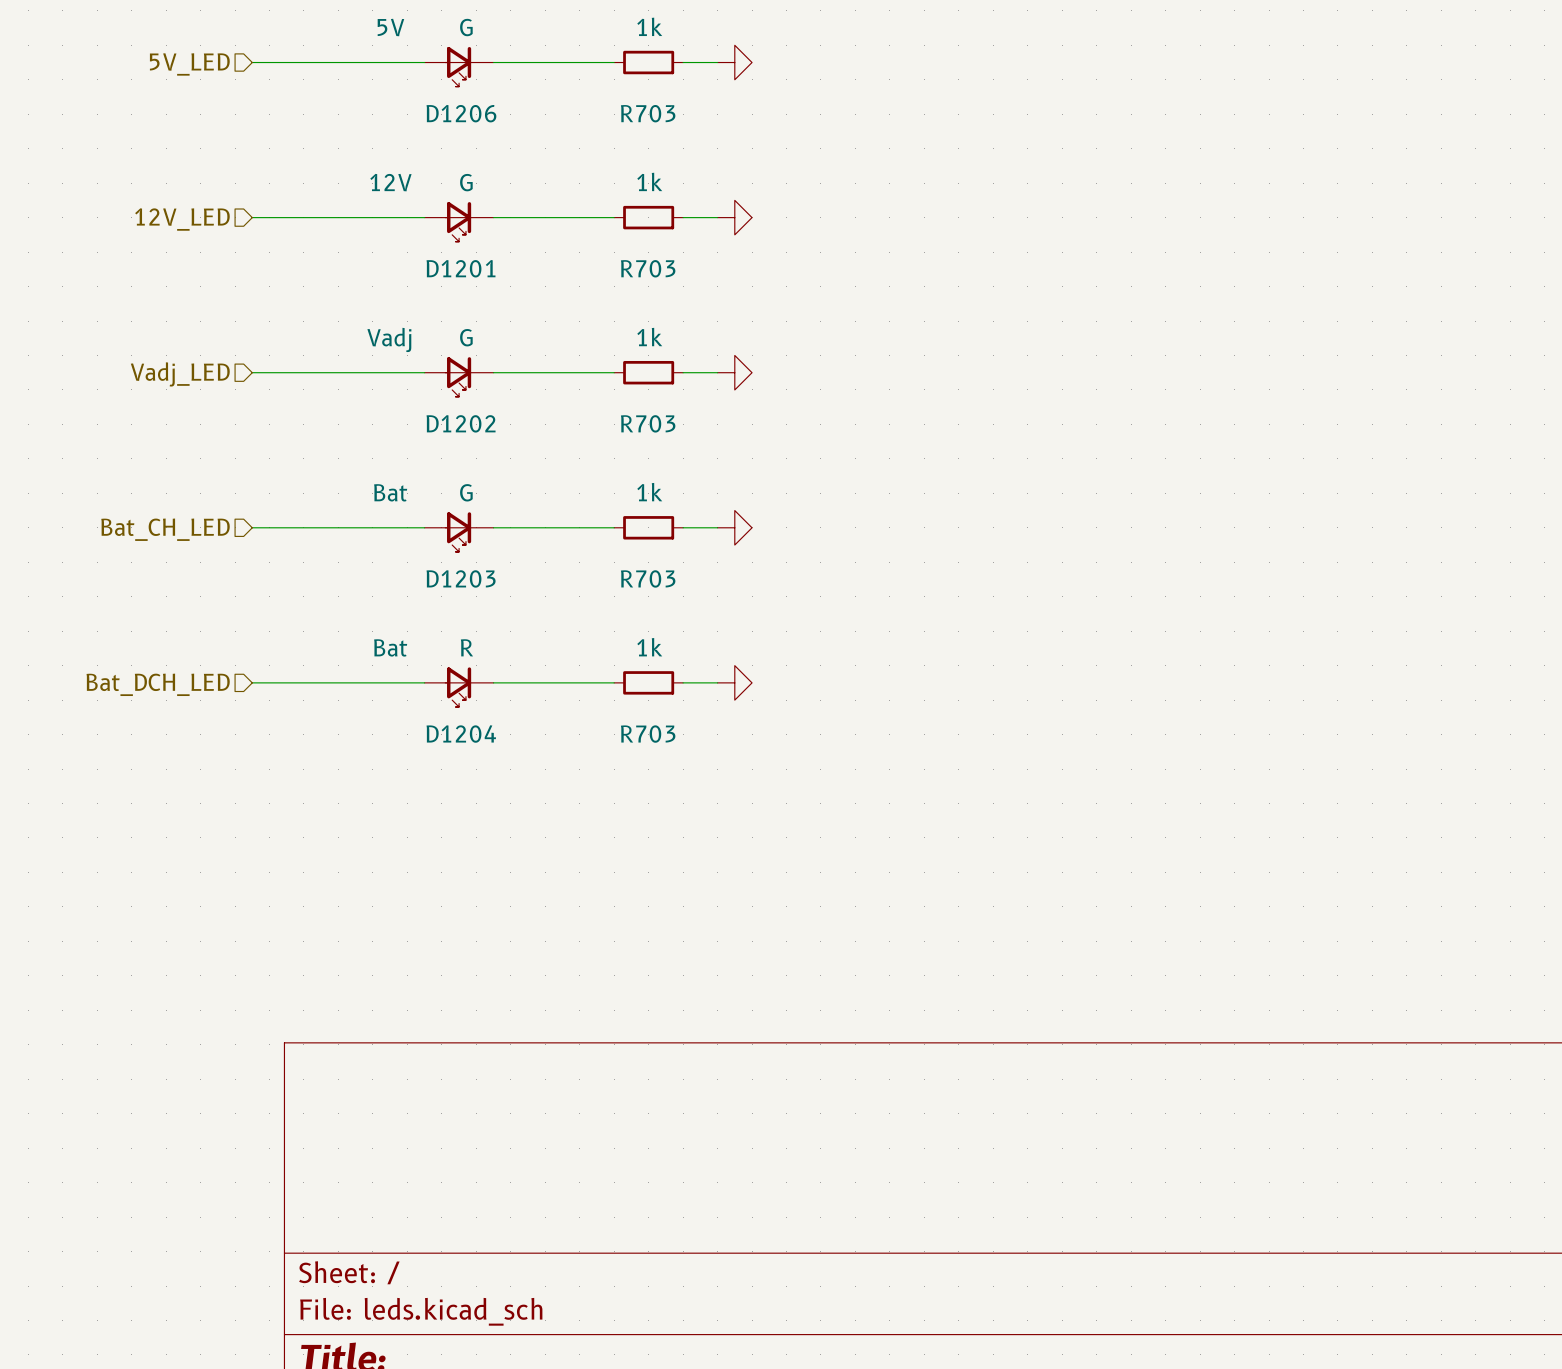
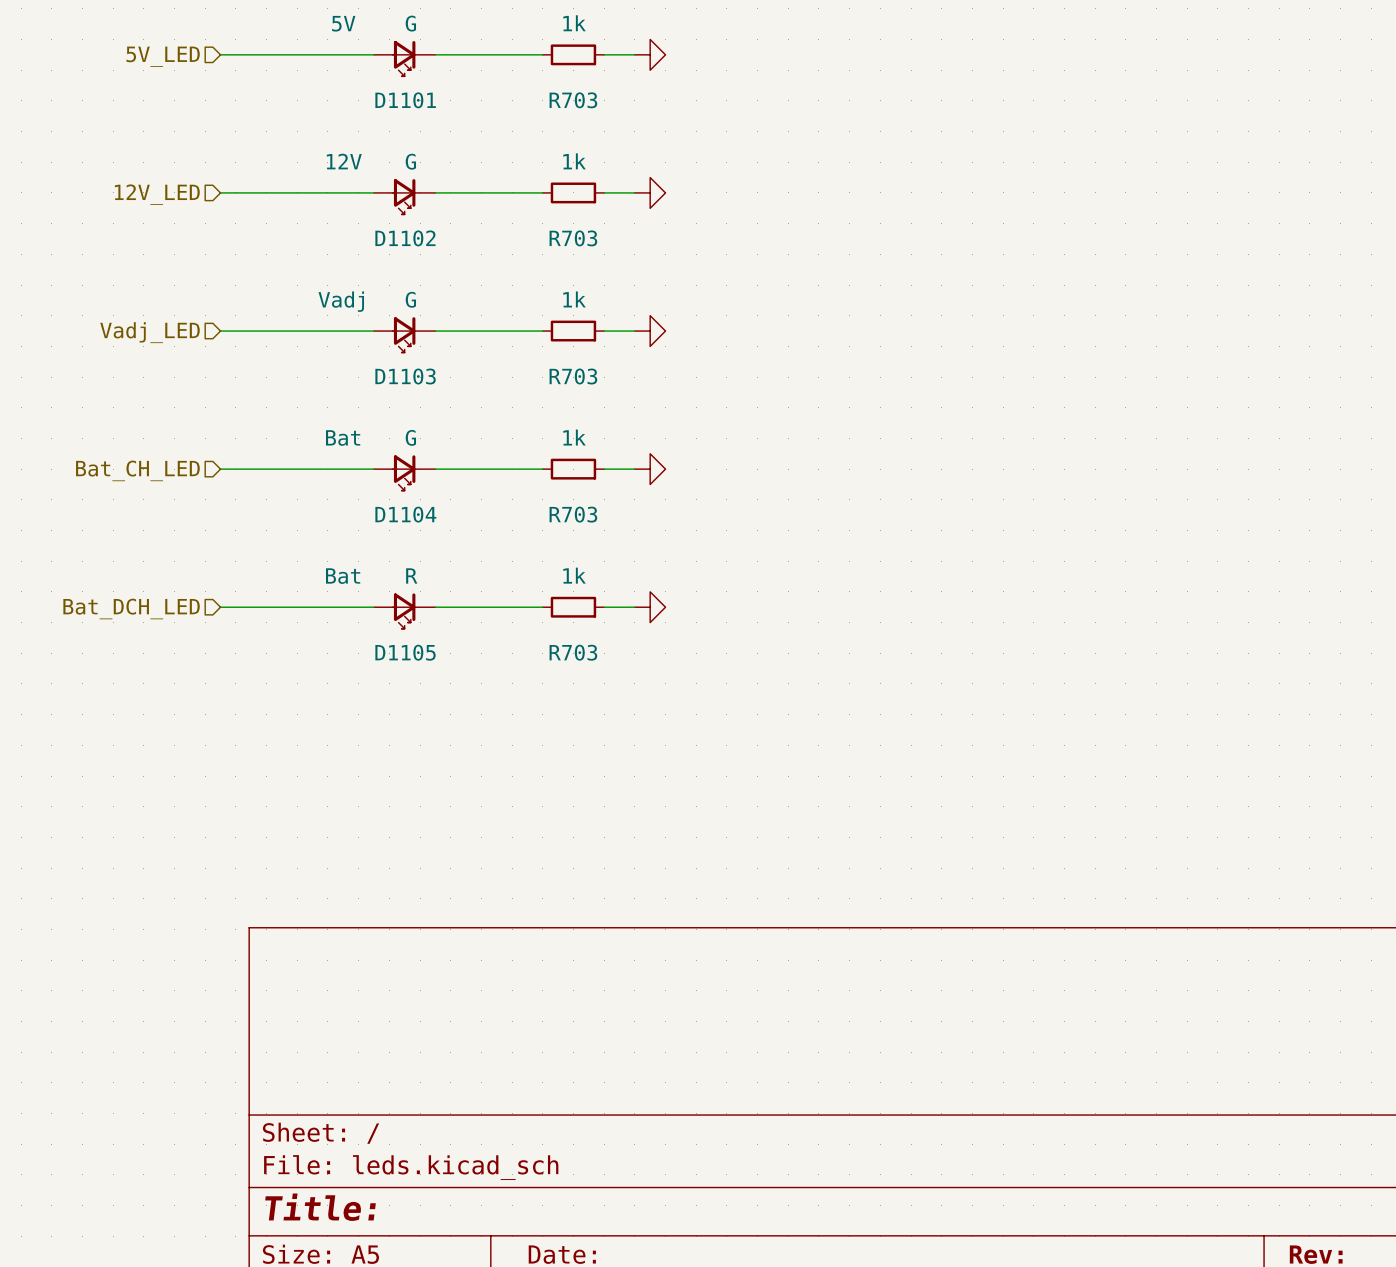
D1206 name: D1206 (461, 113) -> D1101 (405, 100)
D1201 name: D1201 (461, 268) -> D1102 (405, 238)
D1202 name: D1202 (461, 423) -> D1103 (405, 376)
D1203 name: D1203 (461, 578) -> D1104 (405, 514)
D1204 name: D1204 (461, 734) -> D1105 (405, 652)

